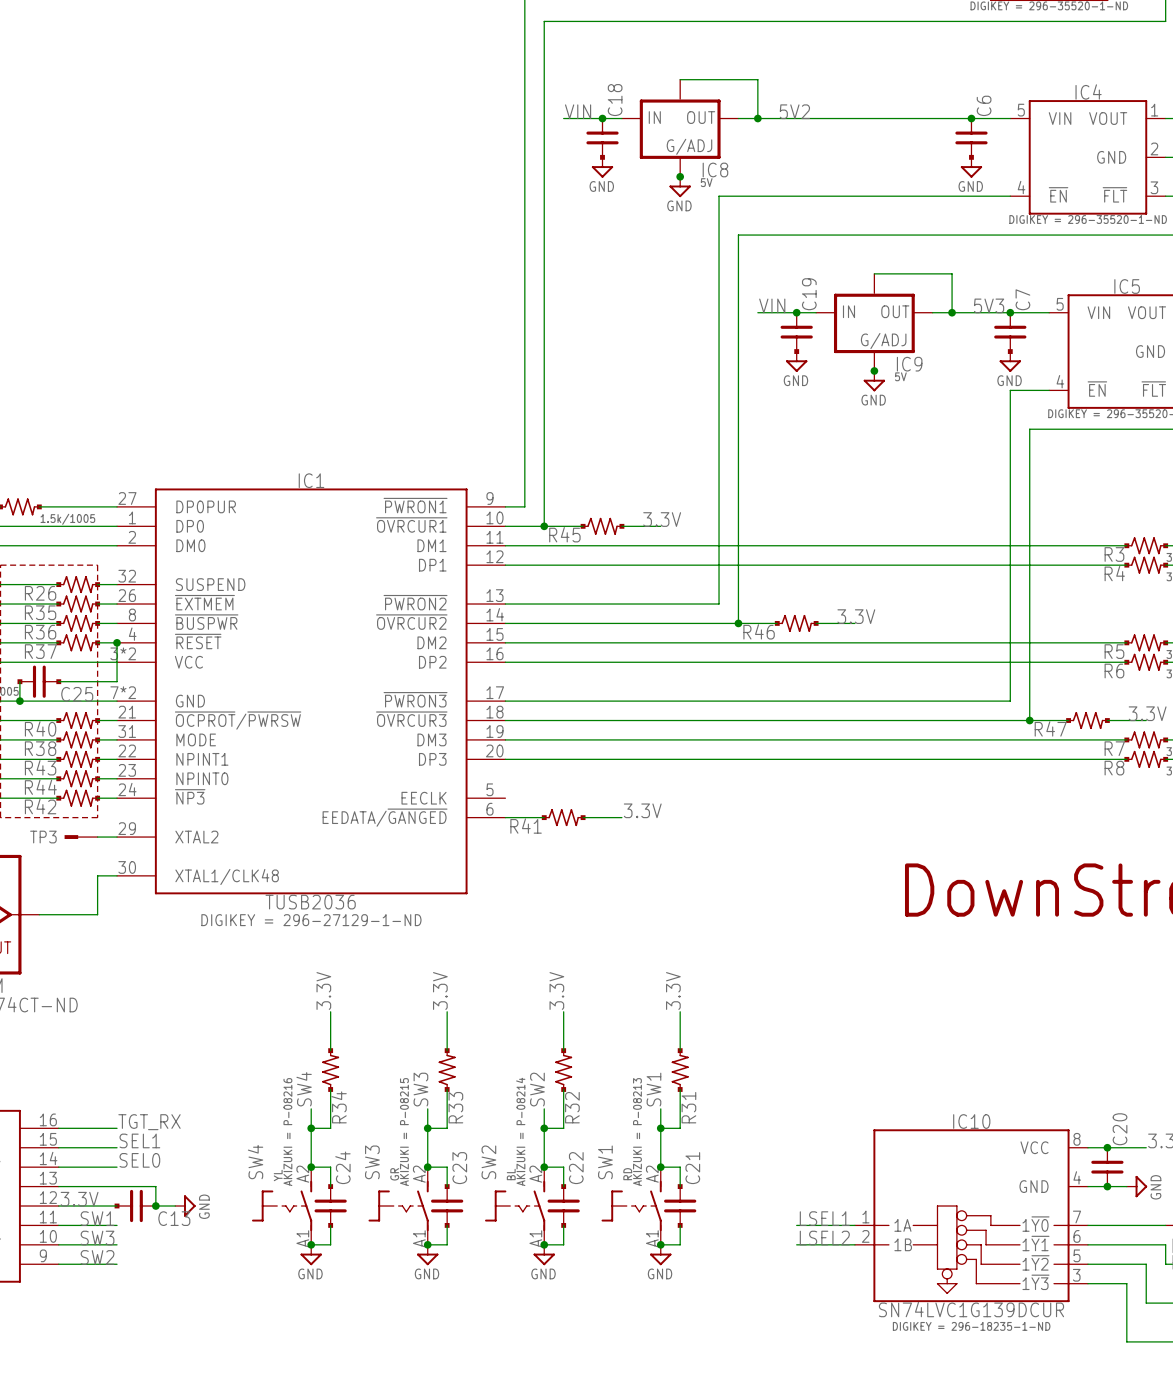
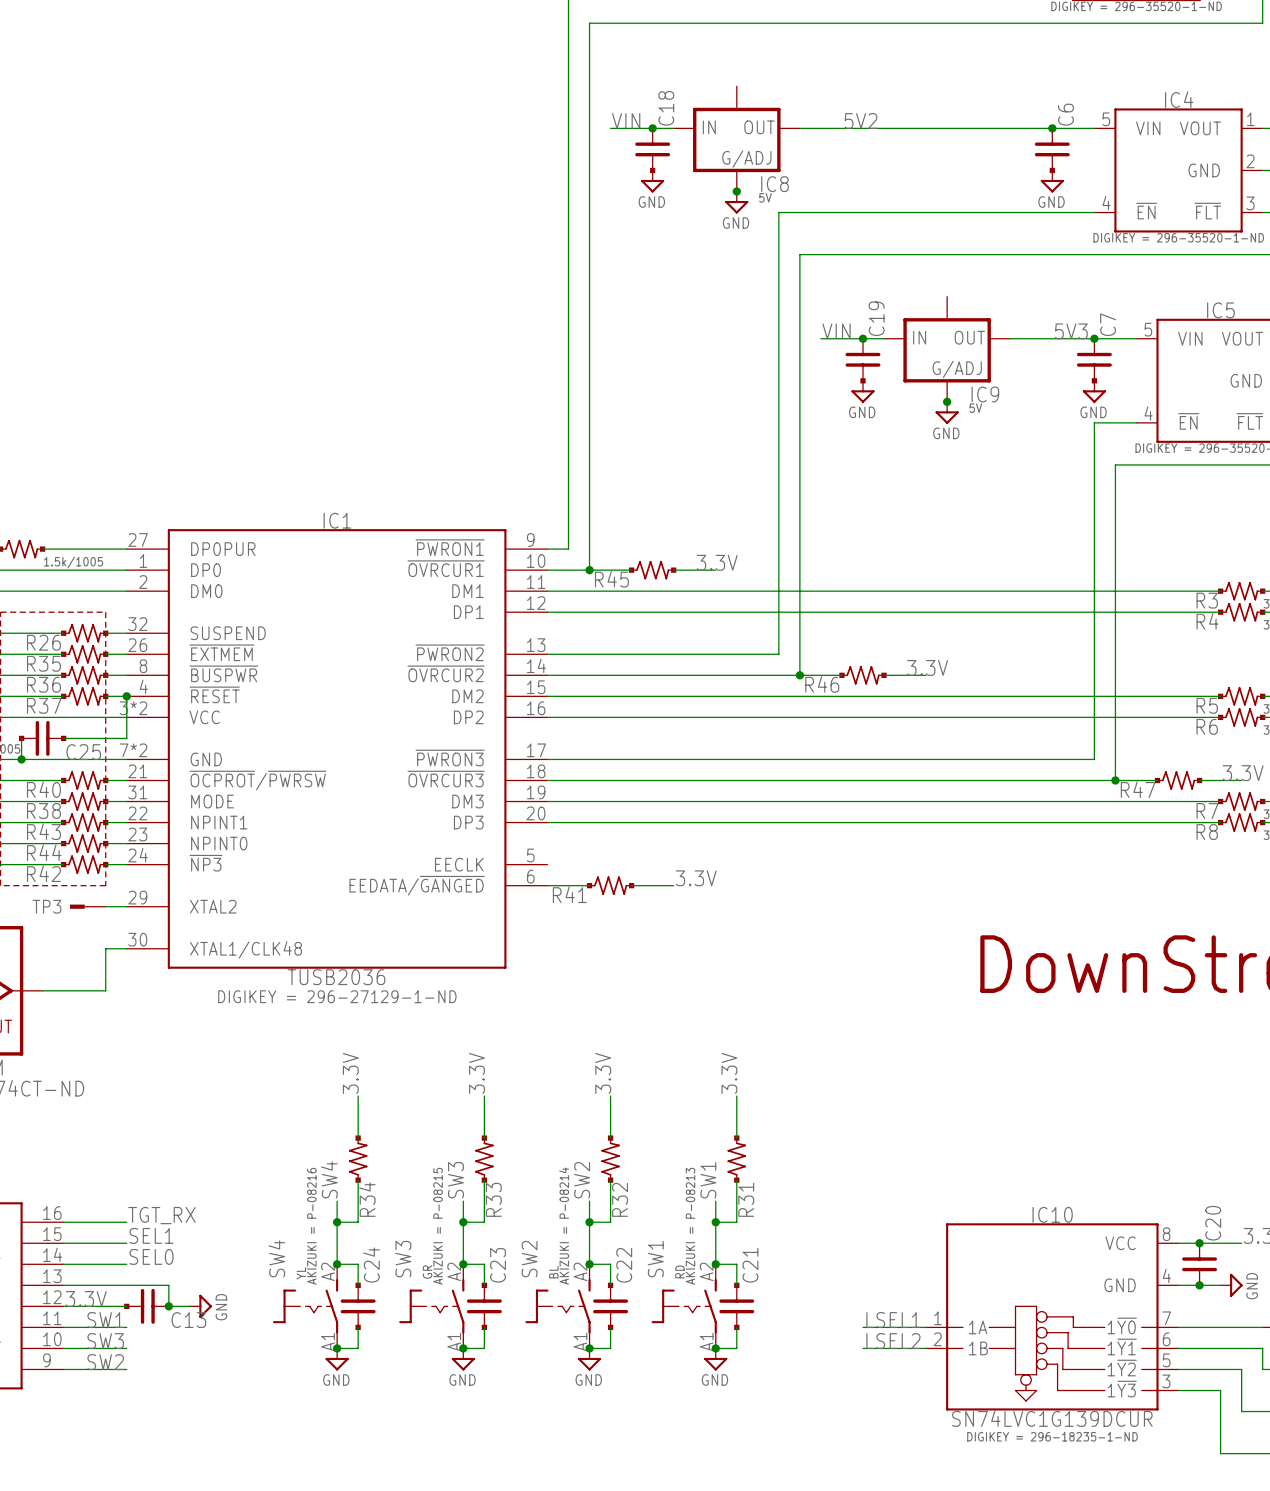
wire: (680, 79) (757, 79) (757, 118) -> none
junction: (757, 118) -> none
wire: (874, 273) (952, 273) (952, 312) -> none
junction: (952, 312) -> none

